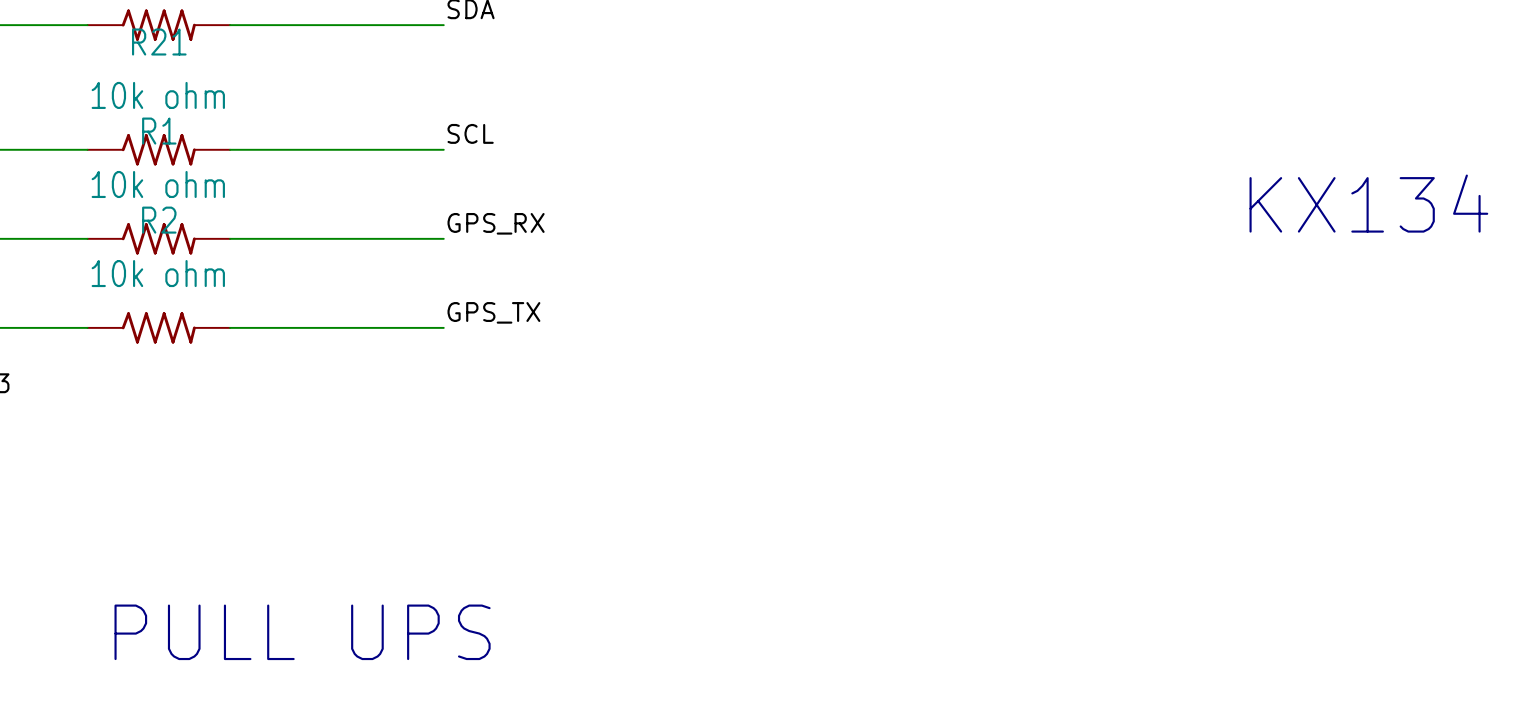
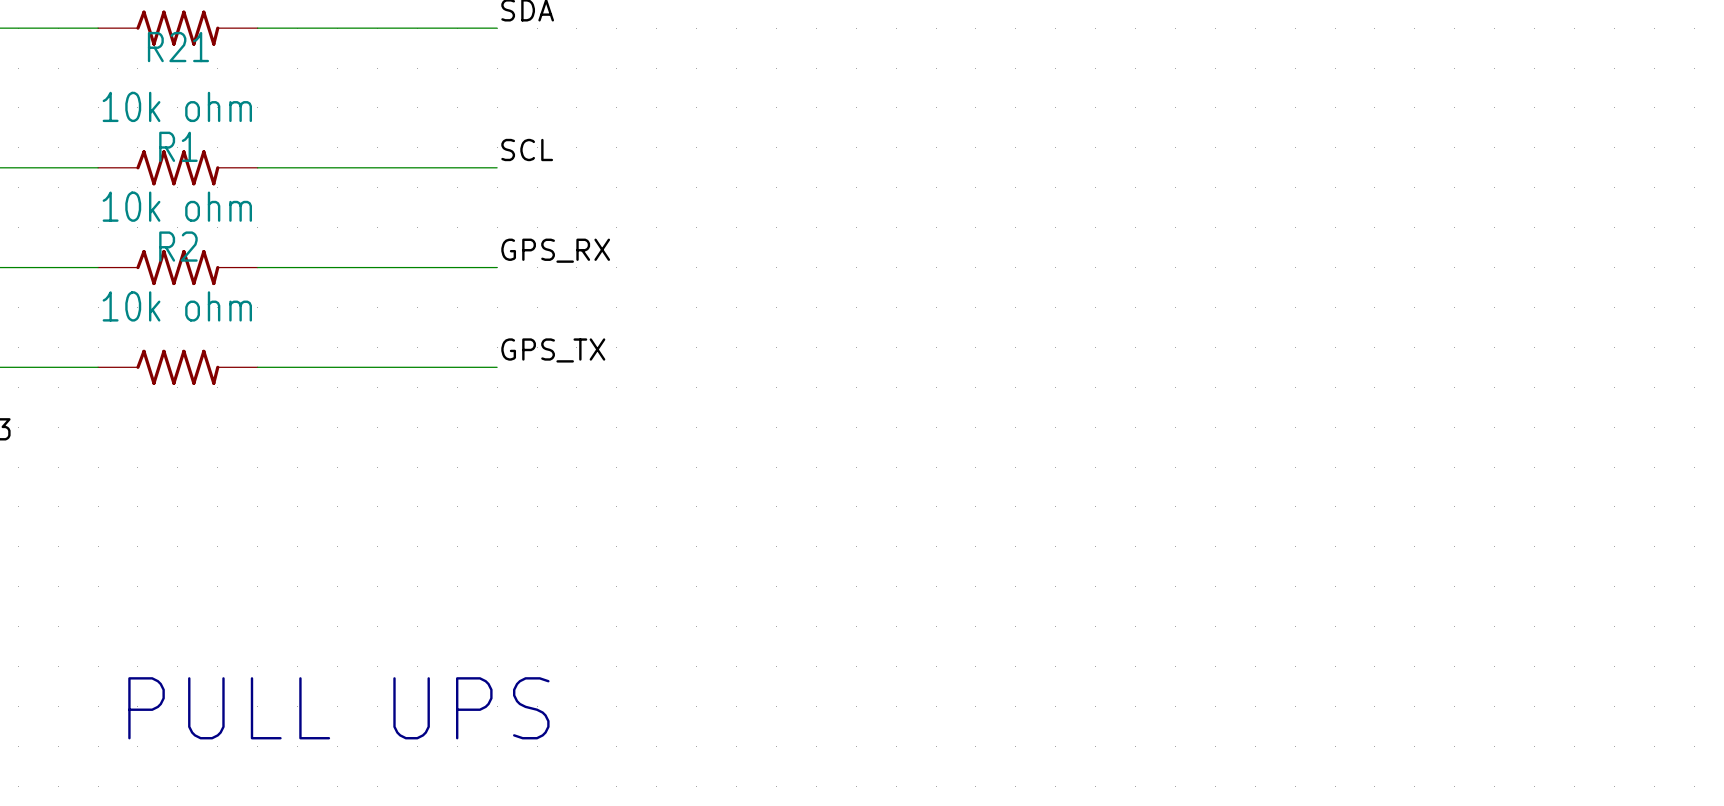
text: KX134 (1368, 203) -> none

